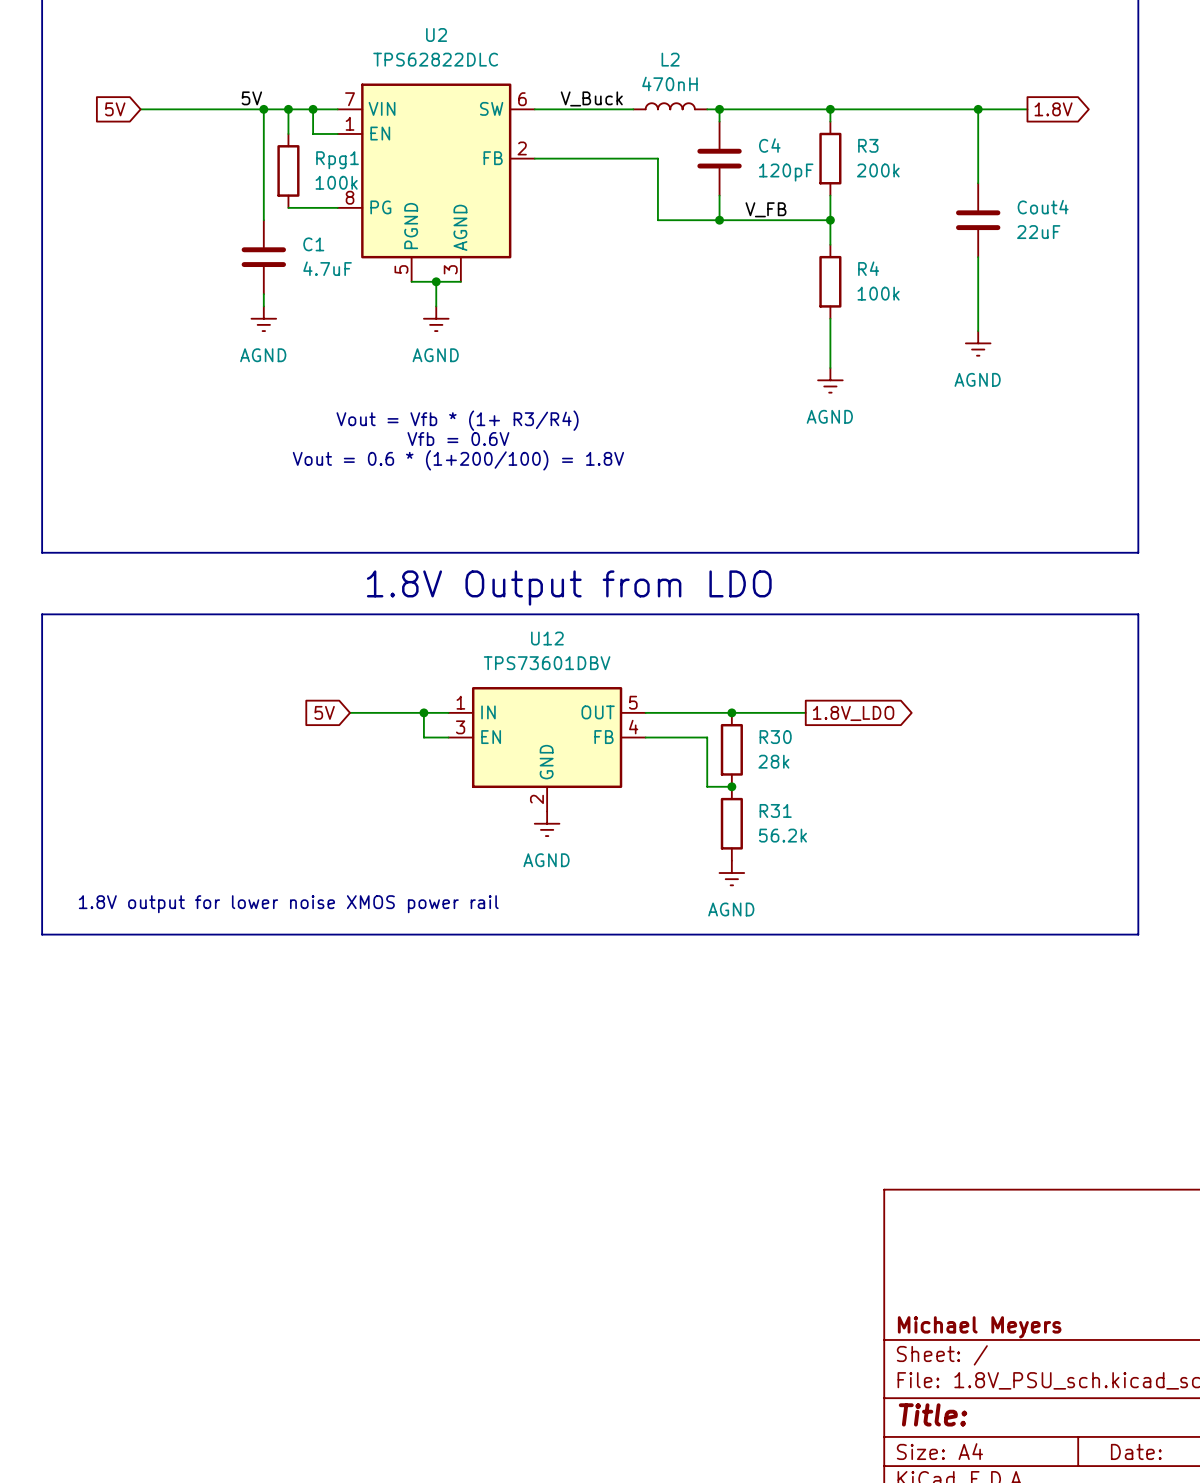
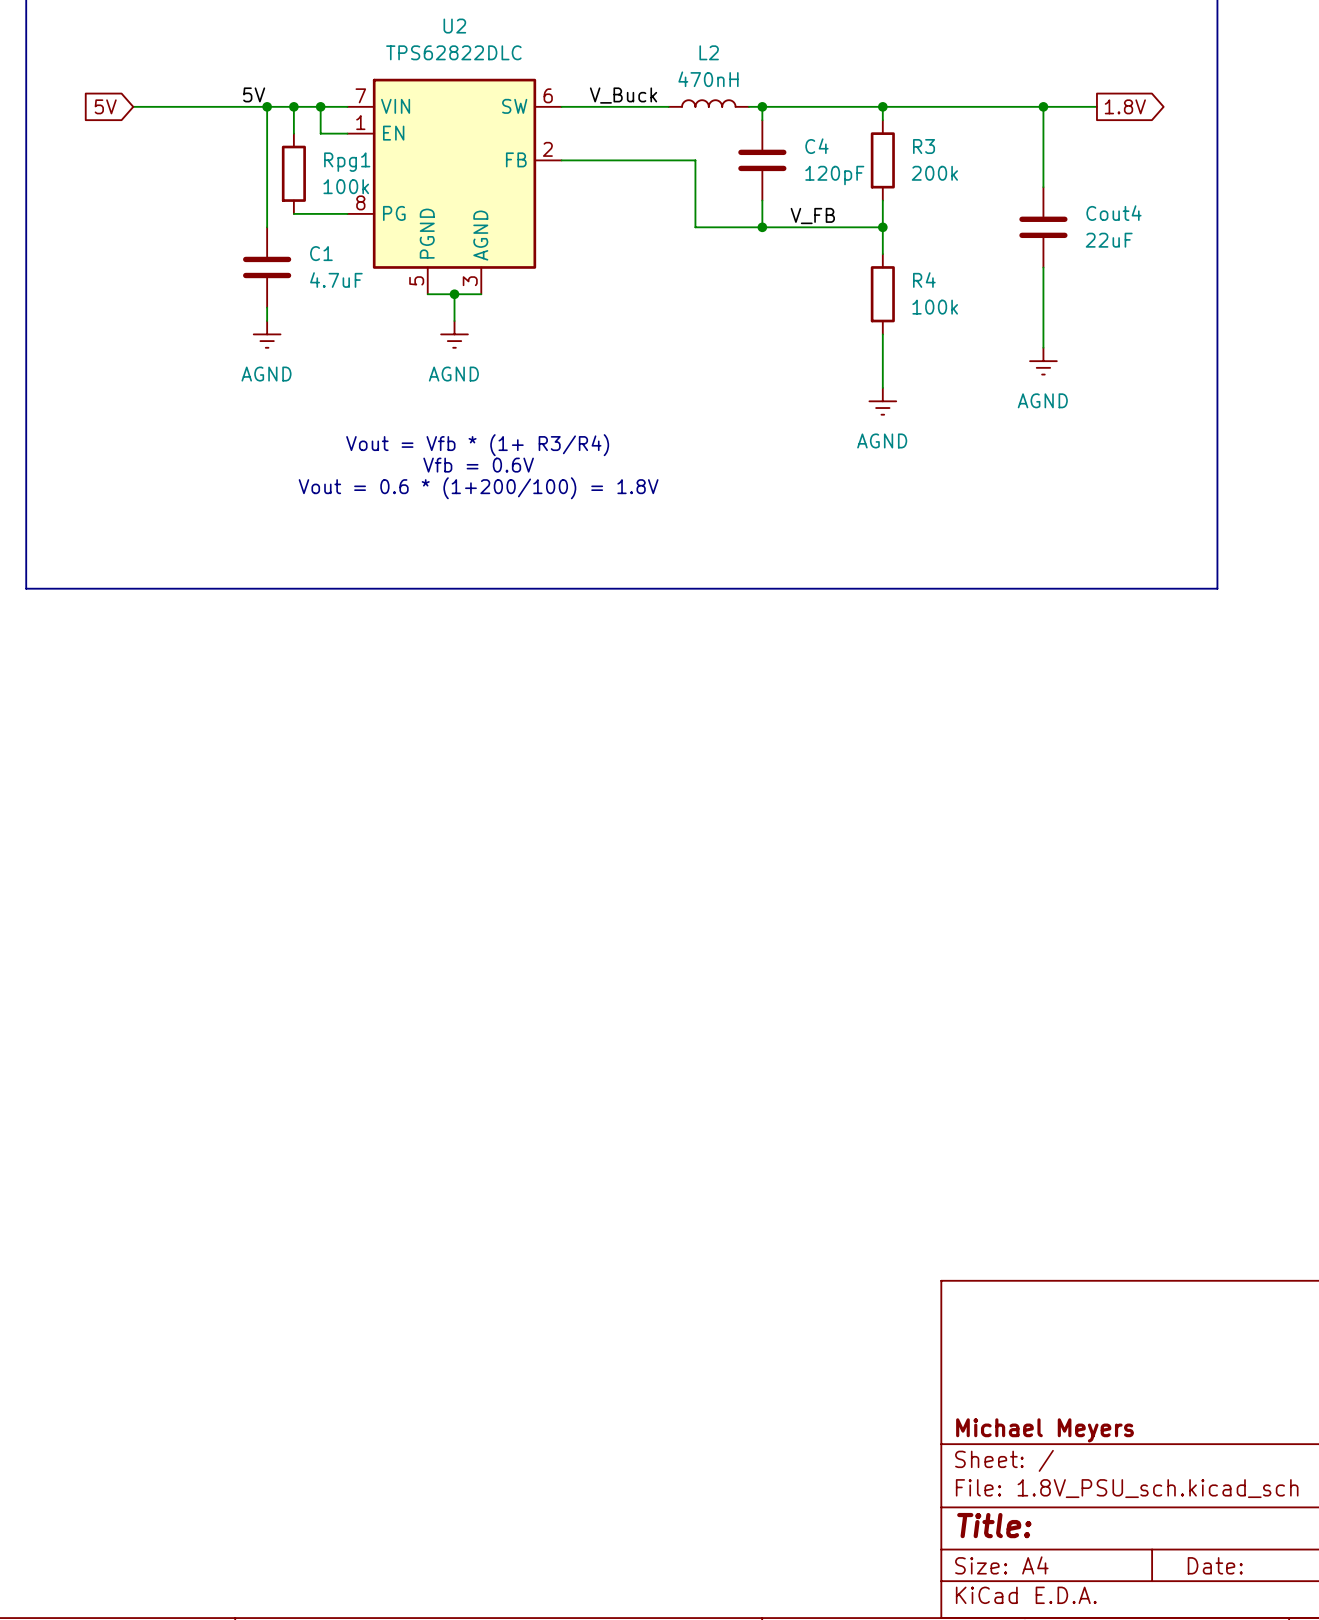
text: 1.8V Output from LDO (569, 588) -> none
line: (42, 614) (1138, 614) (1138, 934) (42, 934) (42, 614) -> none
global label: 5V (324, 712) -> none
wire: (350, 712) (448, 712) -> none
wire: (423, 712) (423, 737) (448, 737) -> none
junction: (423, 712) -> none
wire: (645, 712) (805, 712) -> none
junction: (731, 712) -> none
global label: 1.8V_LDO (853, 713) -> none
wire: (645, 737) (707, 737) (707, 786) (731, 786) -> none
U12: TPS73601DBV (547, 749) -> none
R30: 28k (731, 749) -> none
junction: (731, 786) -> none
power symbol: AGND (547, 823) -> none
R31: 56.2k (731, 823) -> none
power symbol: AGND (731, 873) -> none
text: 1.8V output for lower noise XMOS power rail (288, 904) -> none

